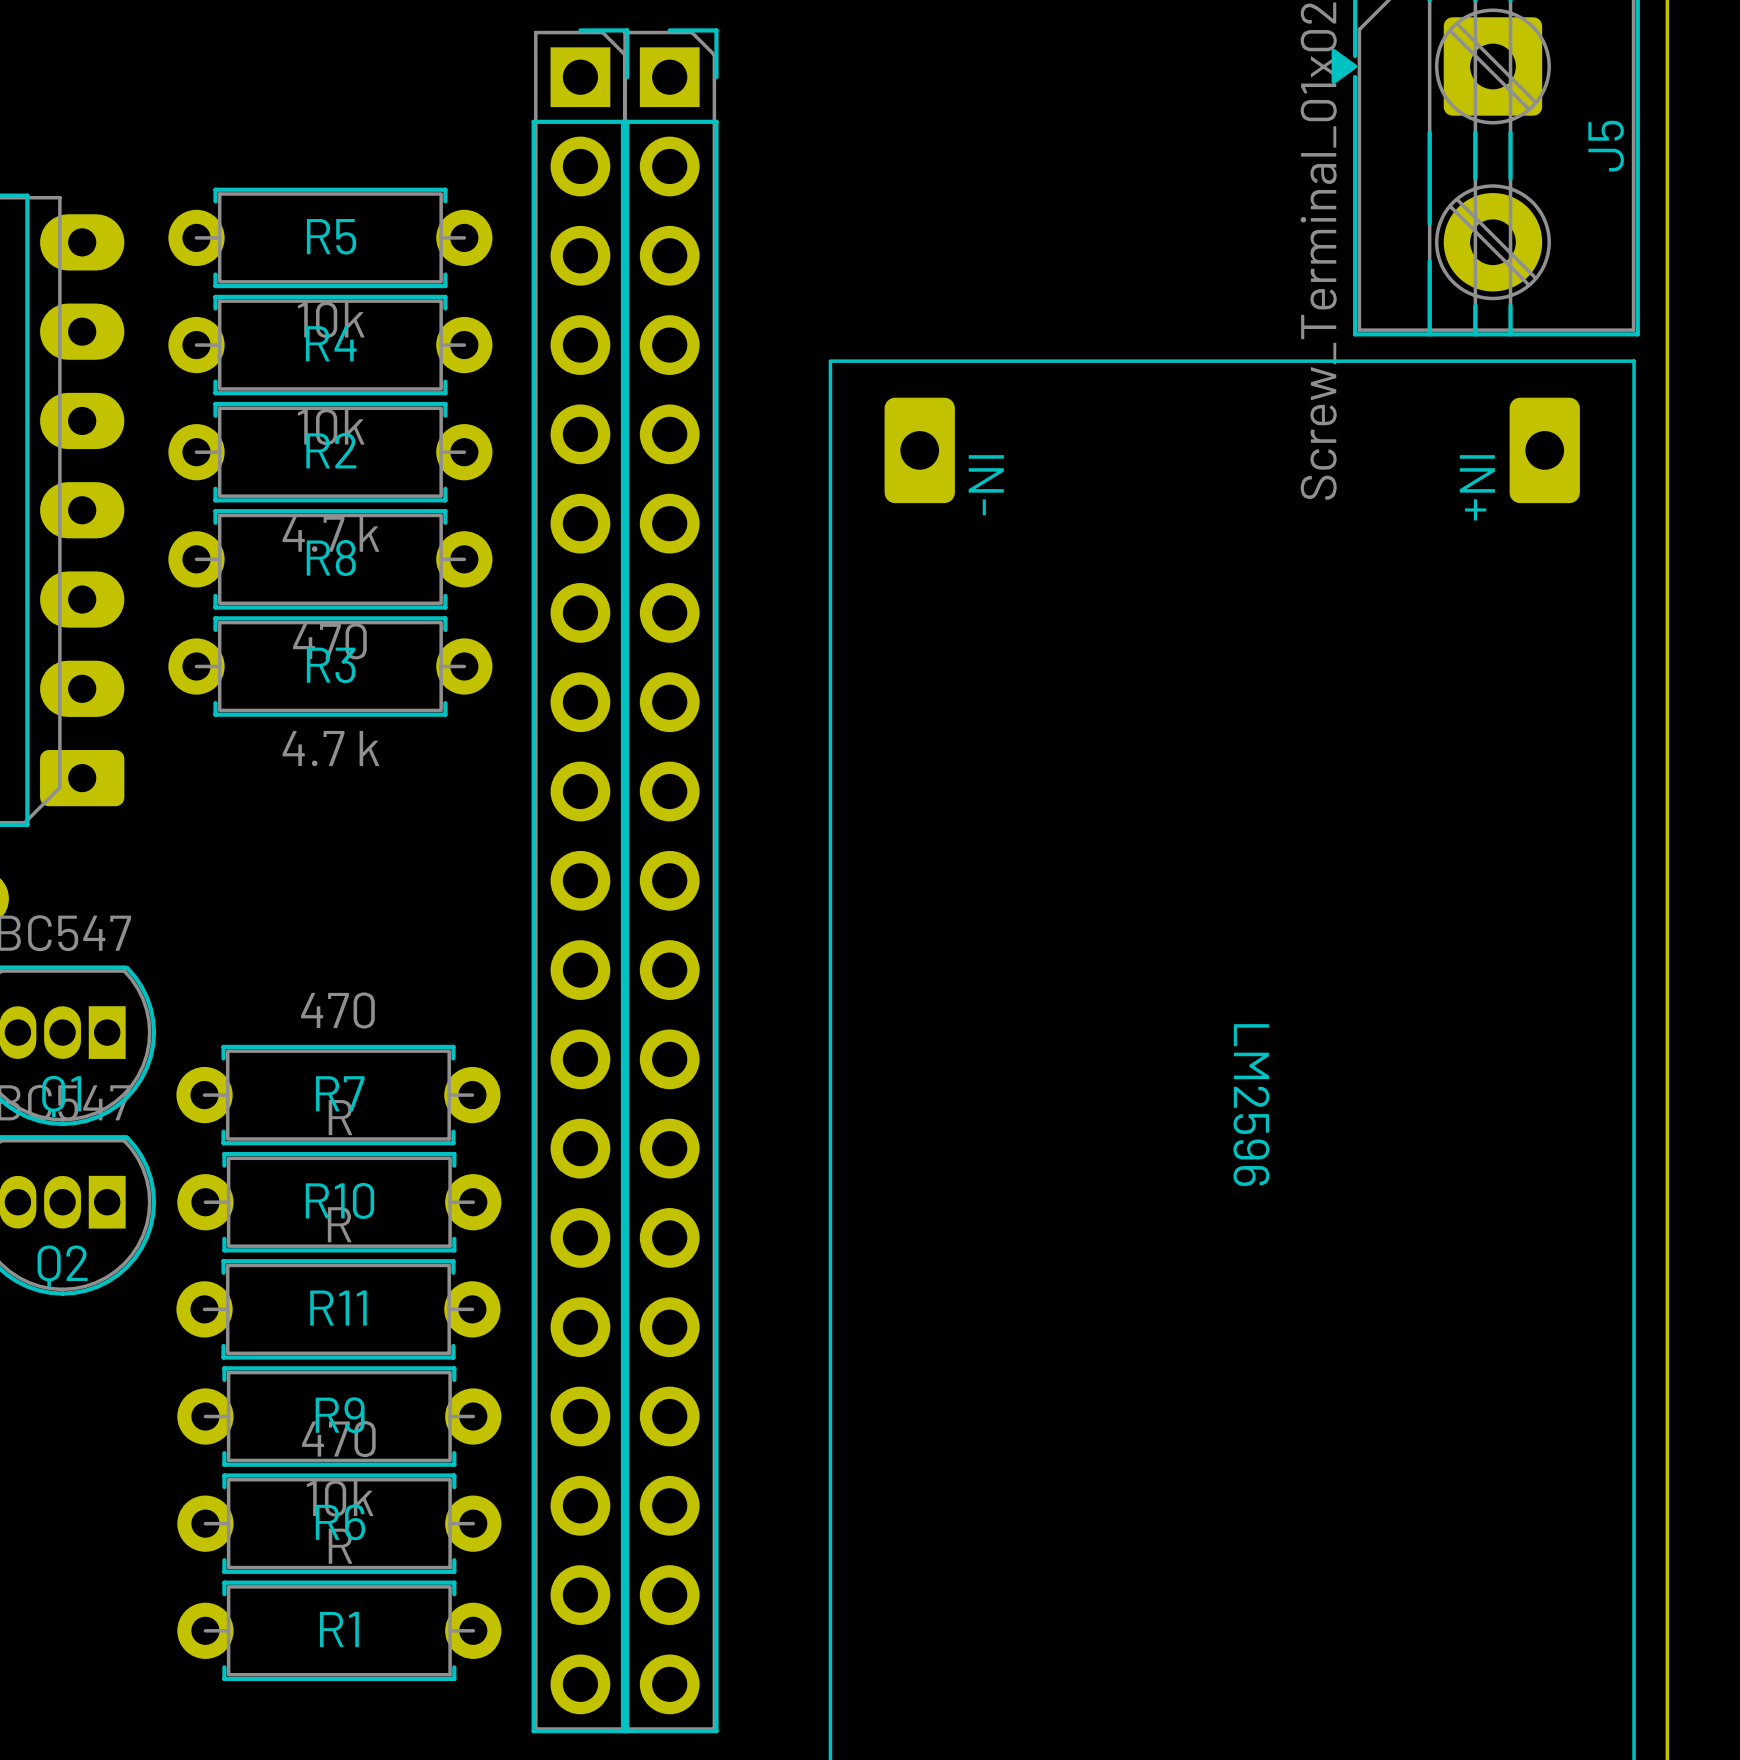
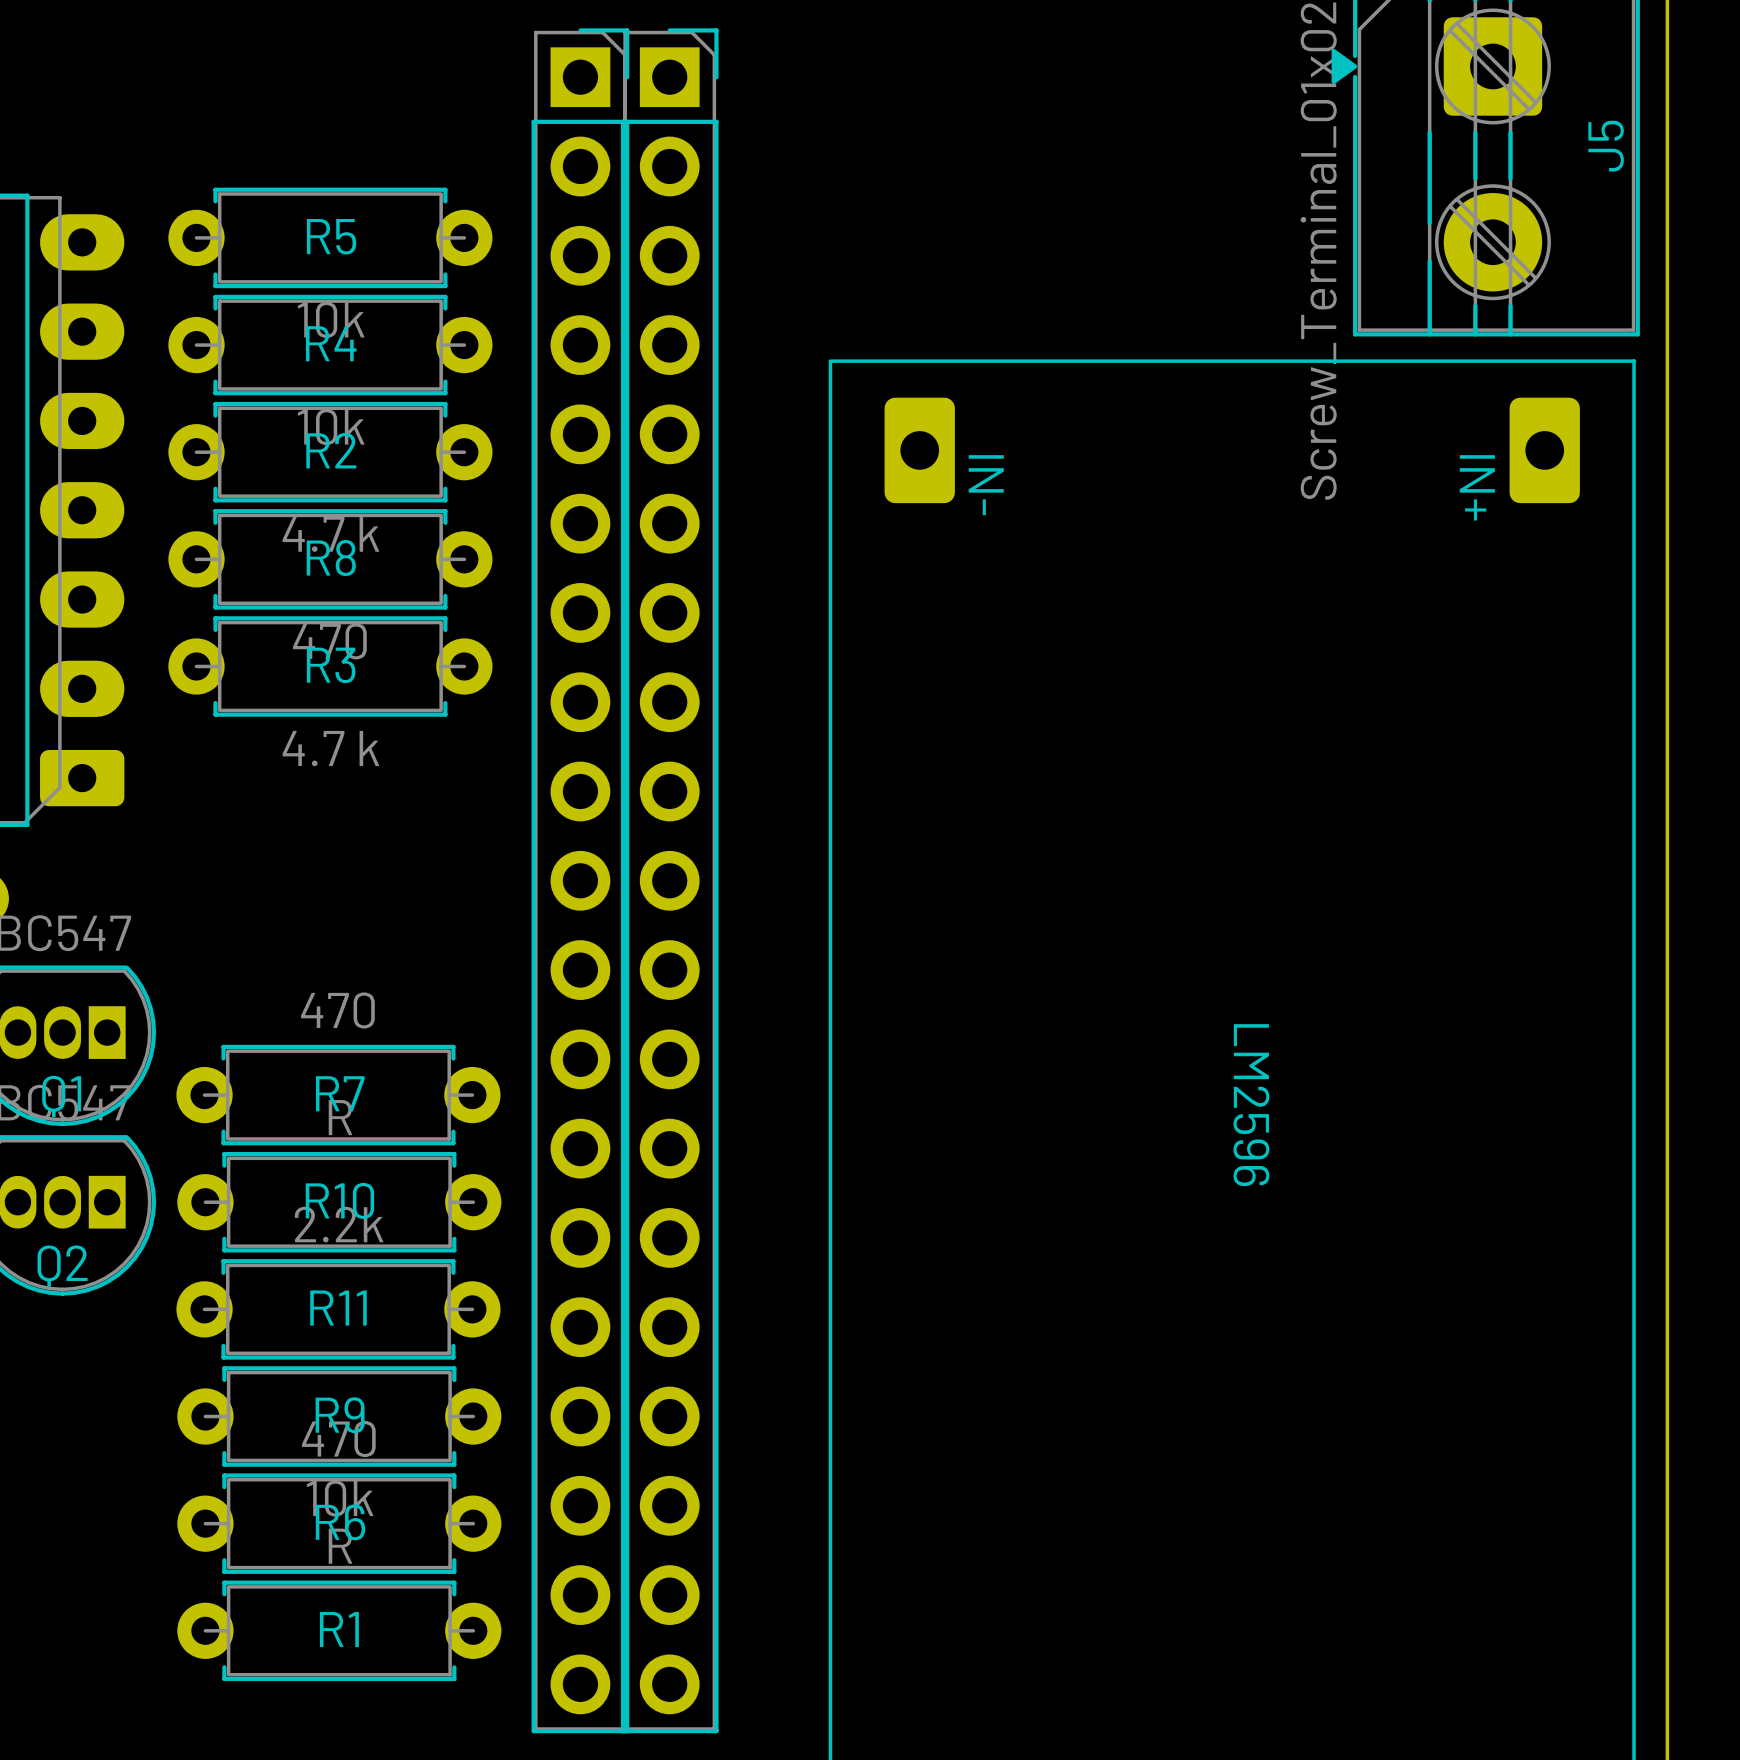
R11 value: R (339, 1224) -> 2.2k (339, 1224)

